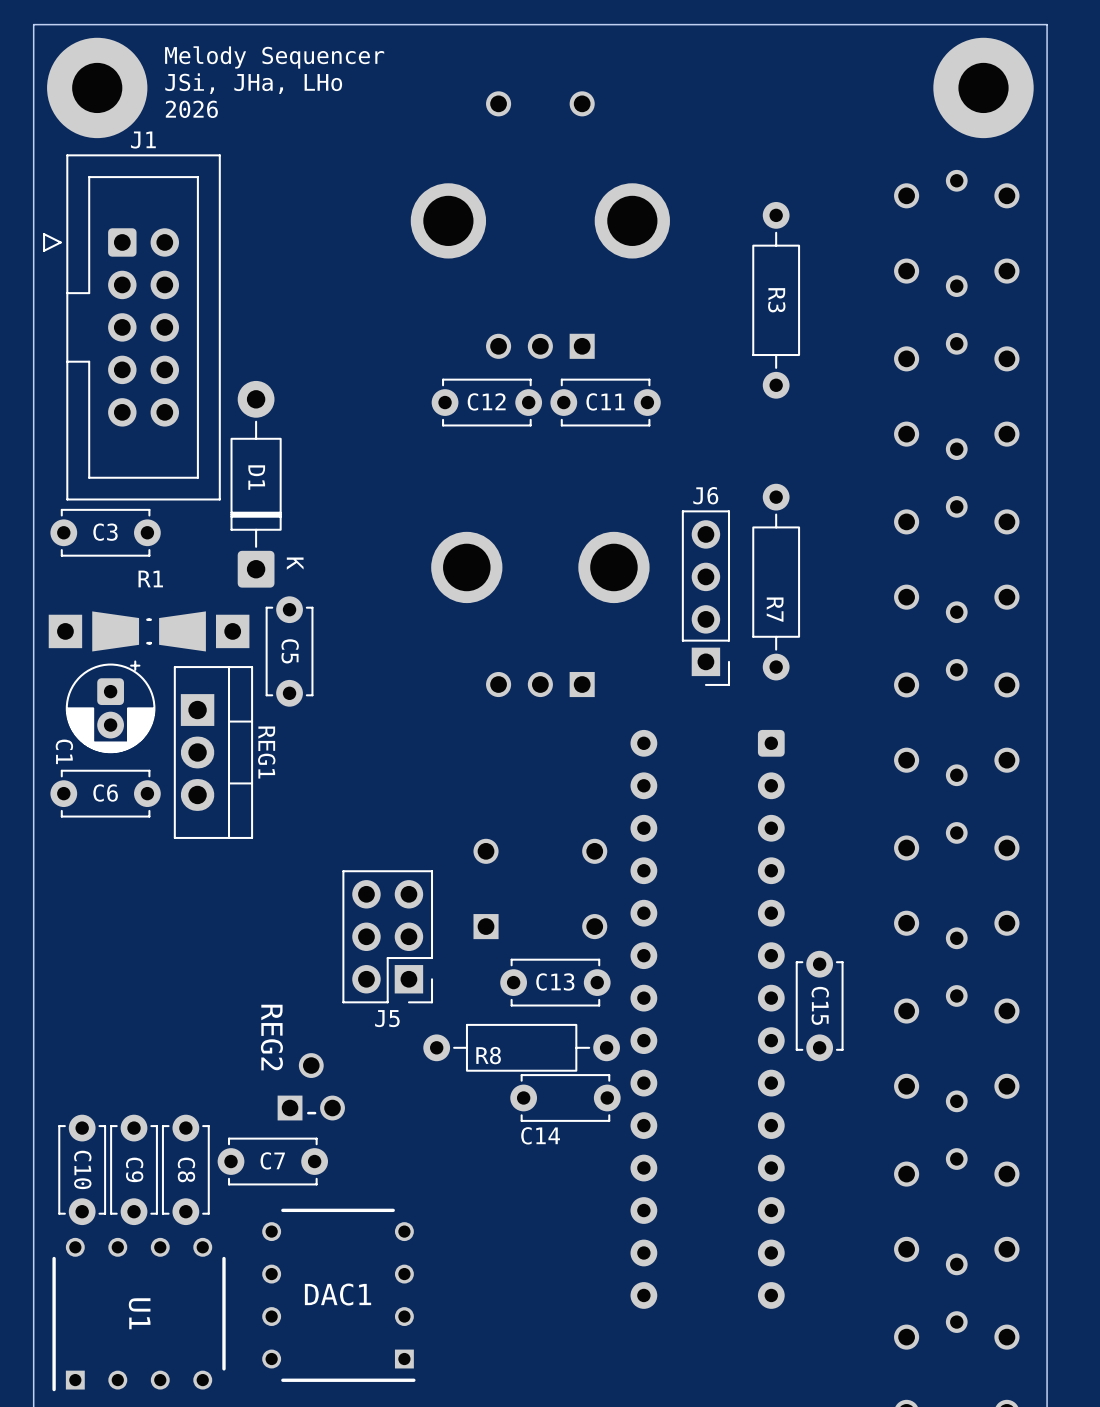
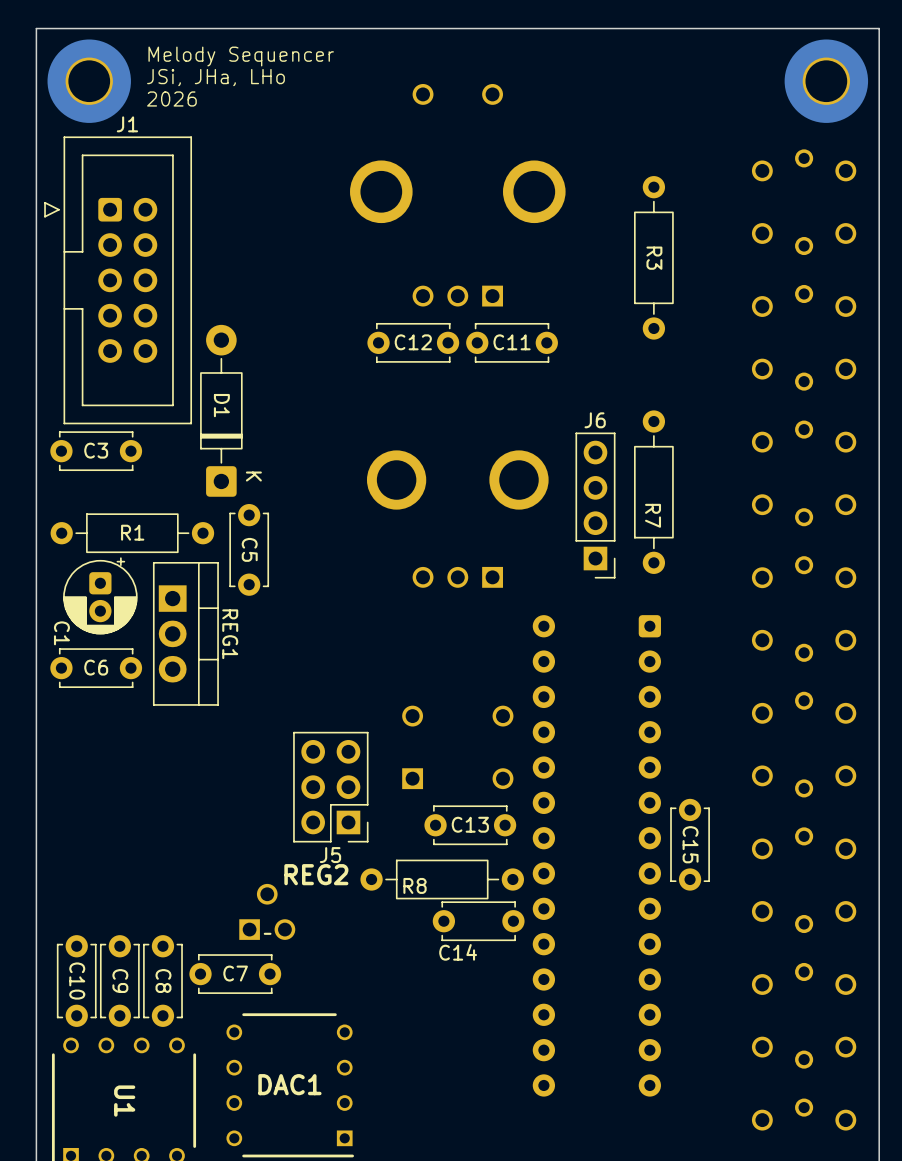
R1 name position: R1 (150, 578) -> R1 (132, 532)
R1 footprint: [48, 611, 250, 652] -> [50, 513, 215, 554]
REG2 name rotation: 0° (271, 1037) -> 90° counterclockwise (316, 874)

